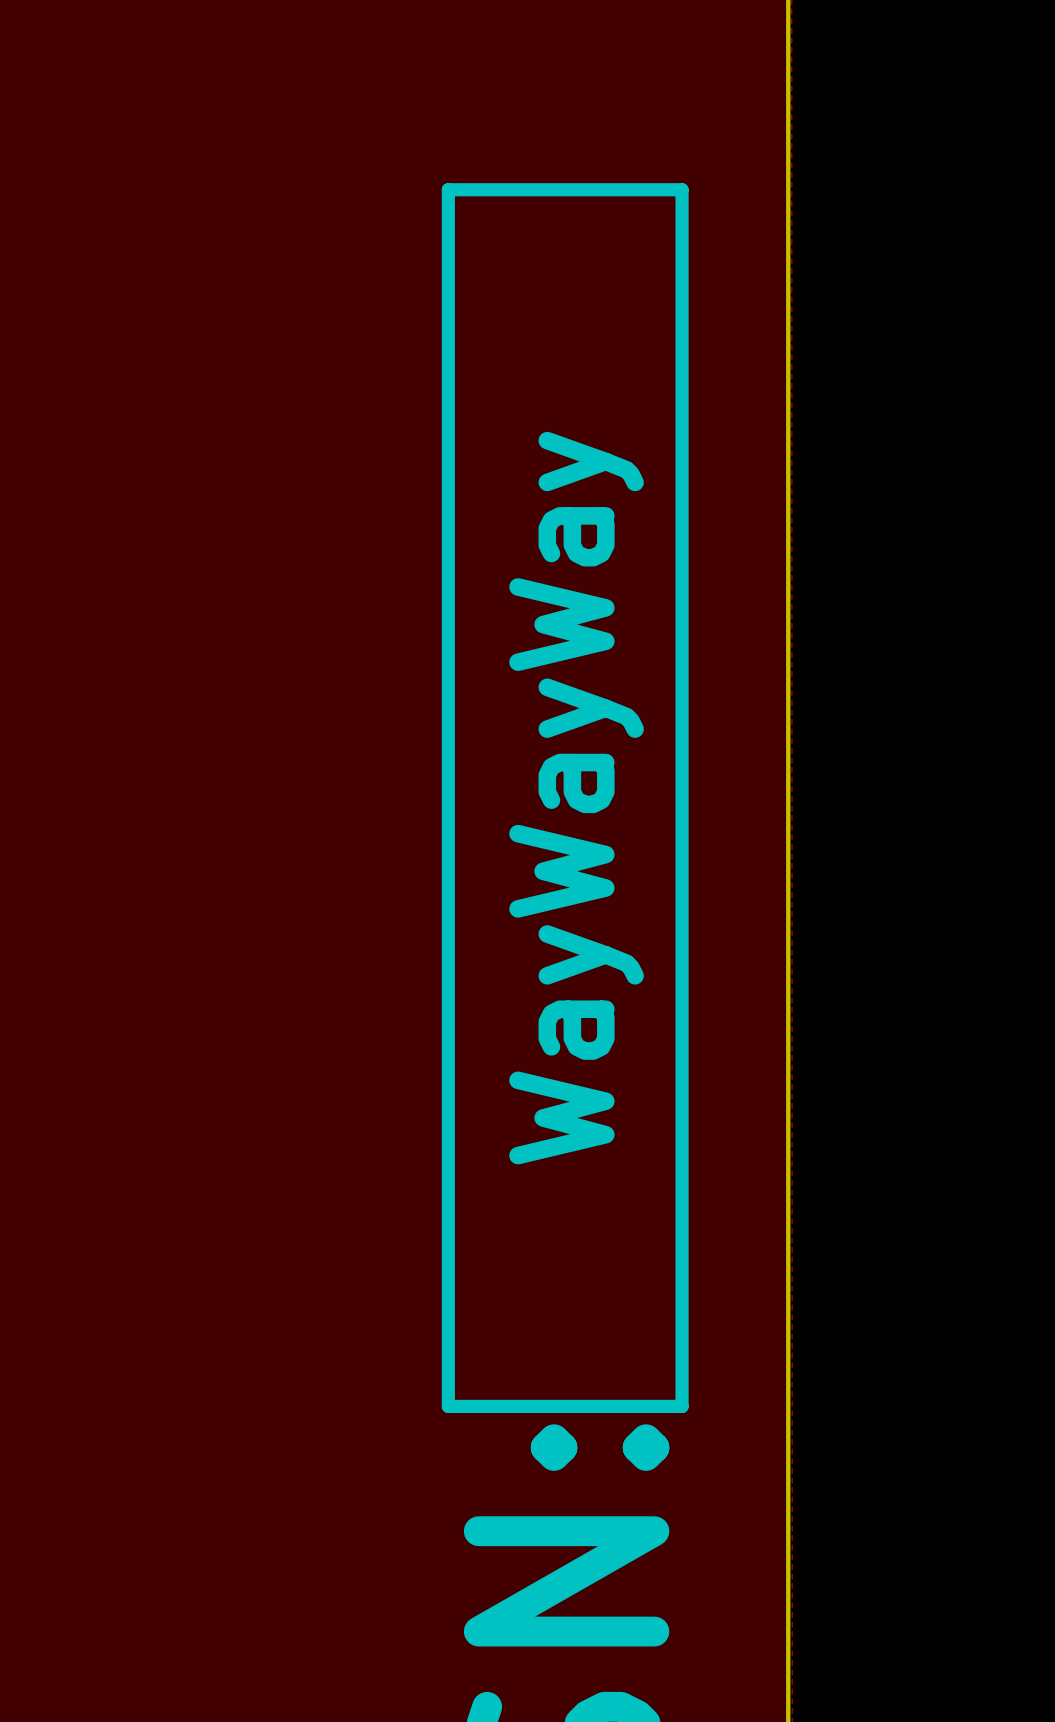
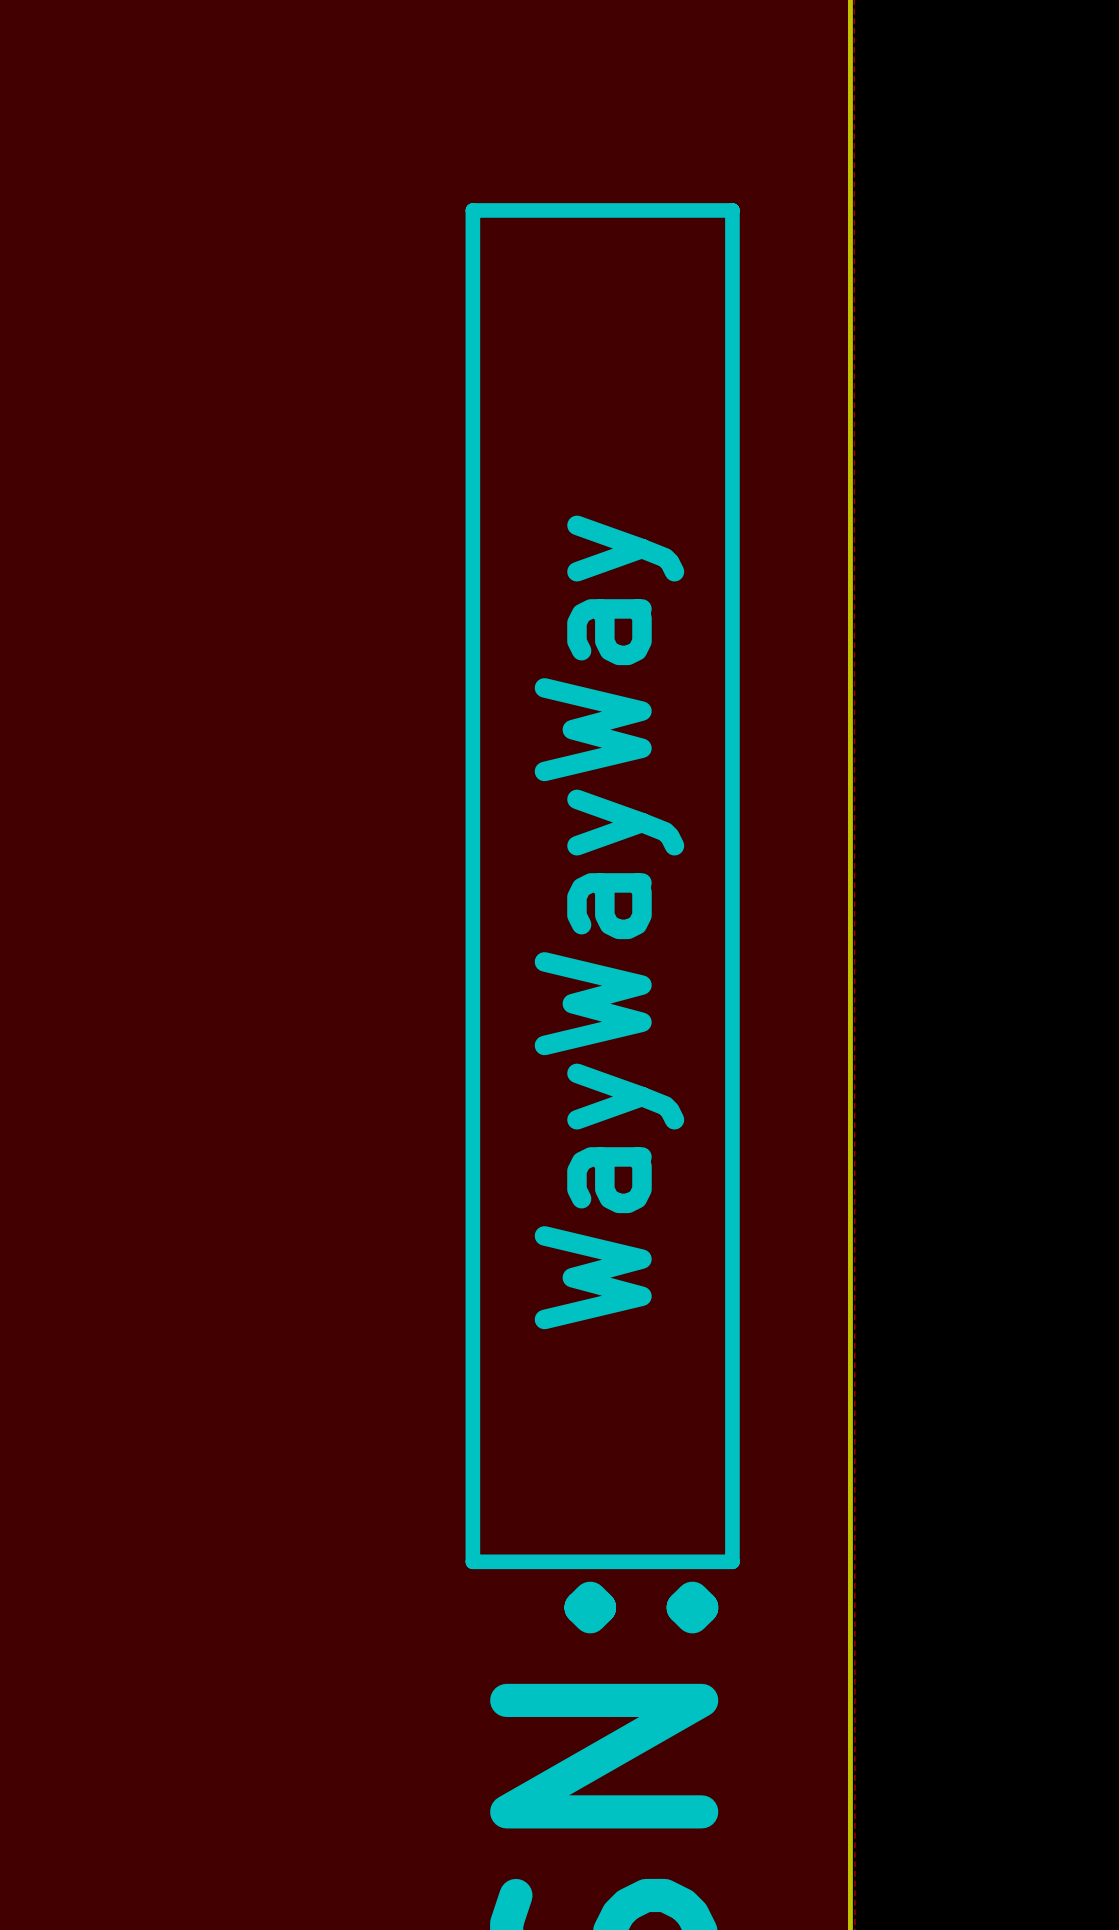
text position: WayWayWay (576, 798) -> WayWayWay (609, 922)

